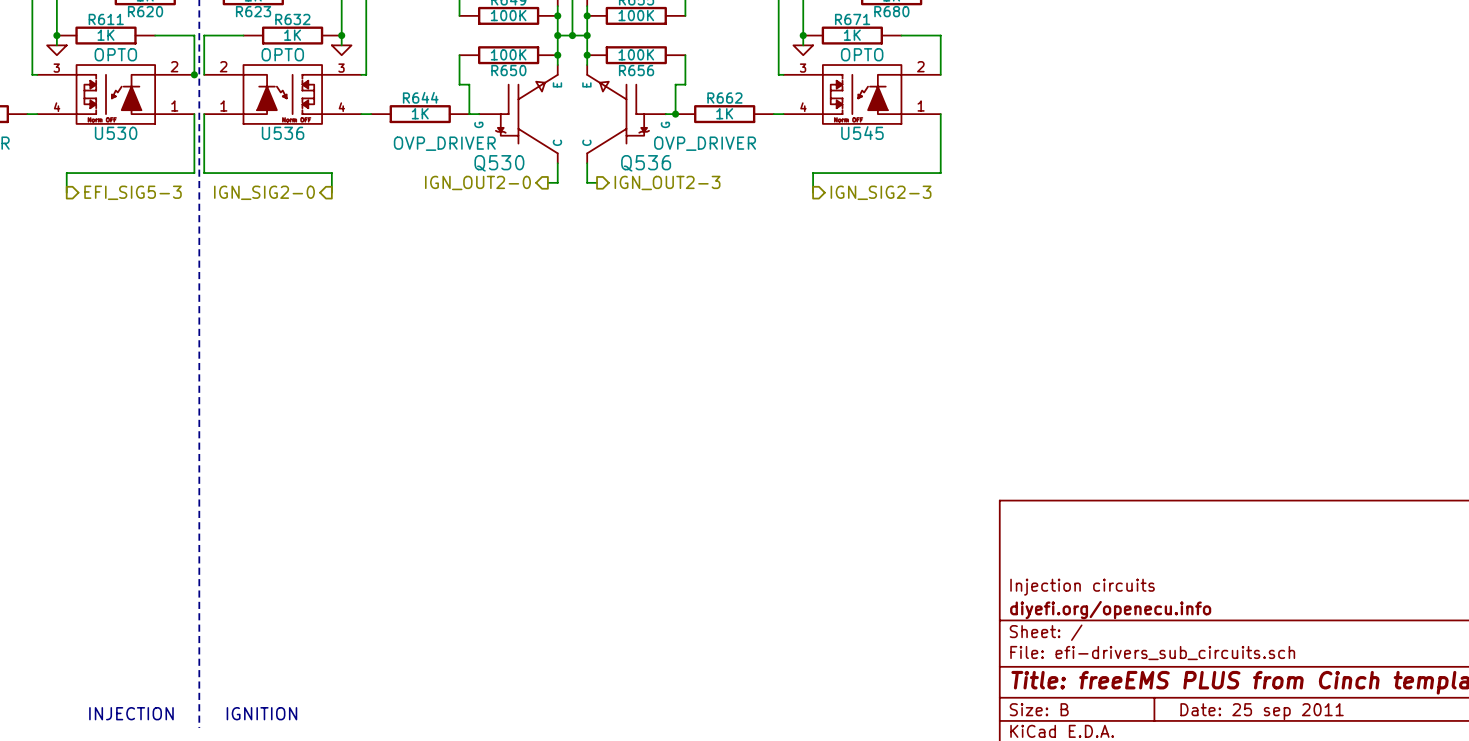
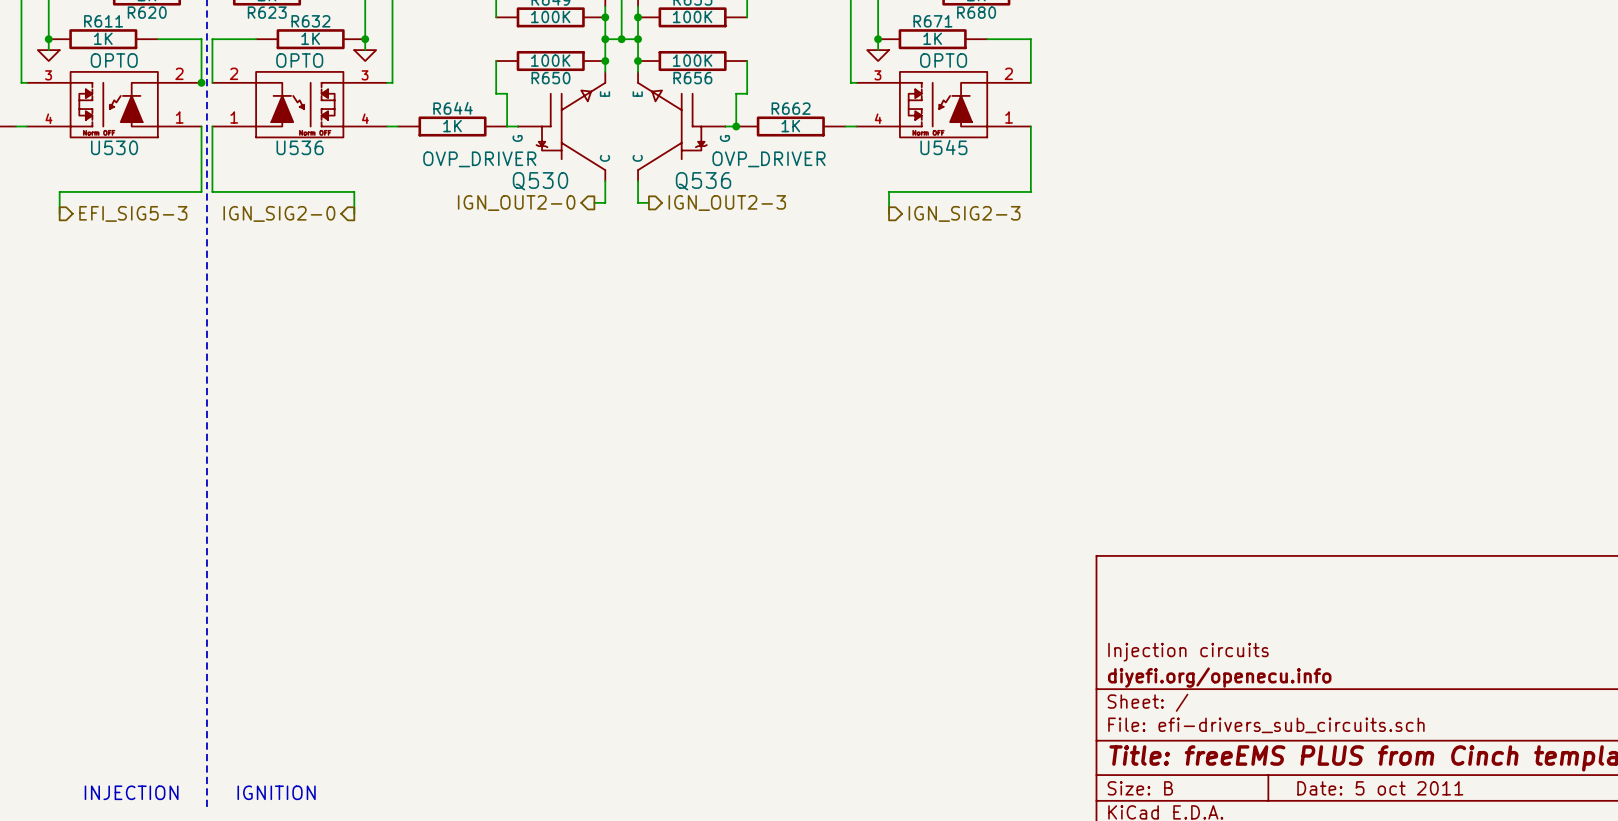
title block: Date: 25 sep 2011 (1262, 711) -> Date: 5 oct 2011 (1380, 788)

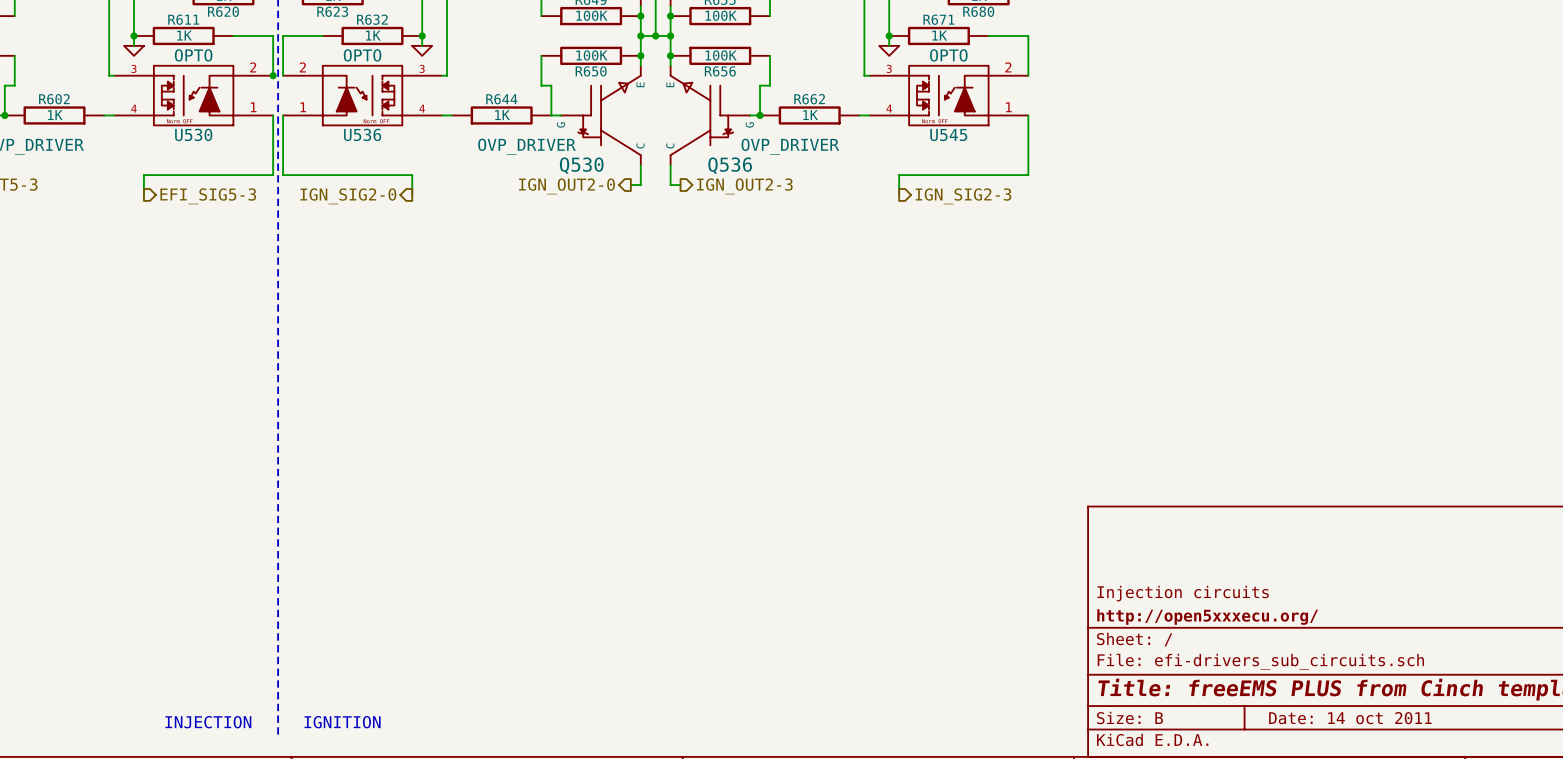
title block: diyefi.org/openecu.info (1219, 677) -> http://open5xxxecu.org/ (1207, 617)
title block: Date: 5 oct 2011 (1380, 788) -> Date: 14 oct 2011 (1350, 718)

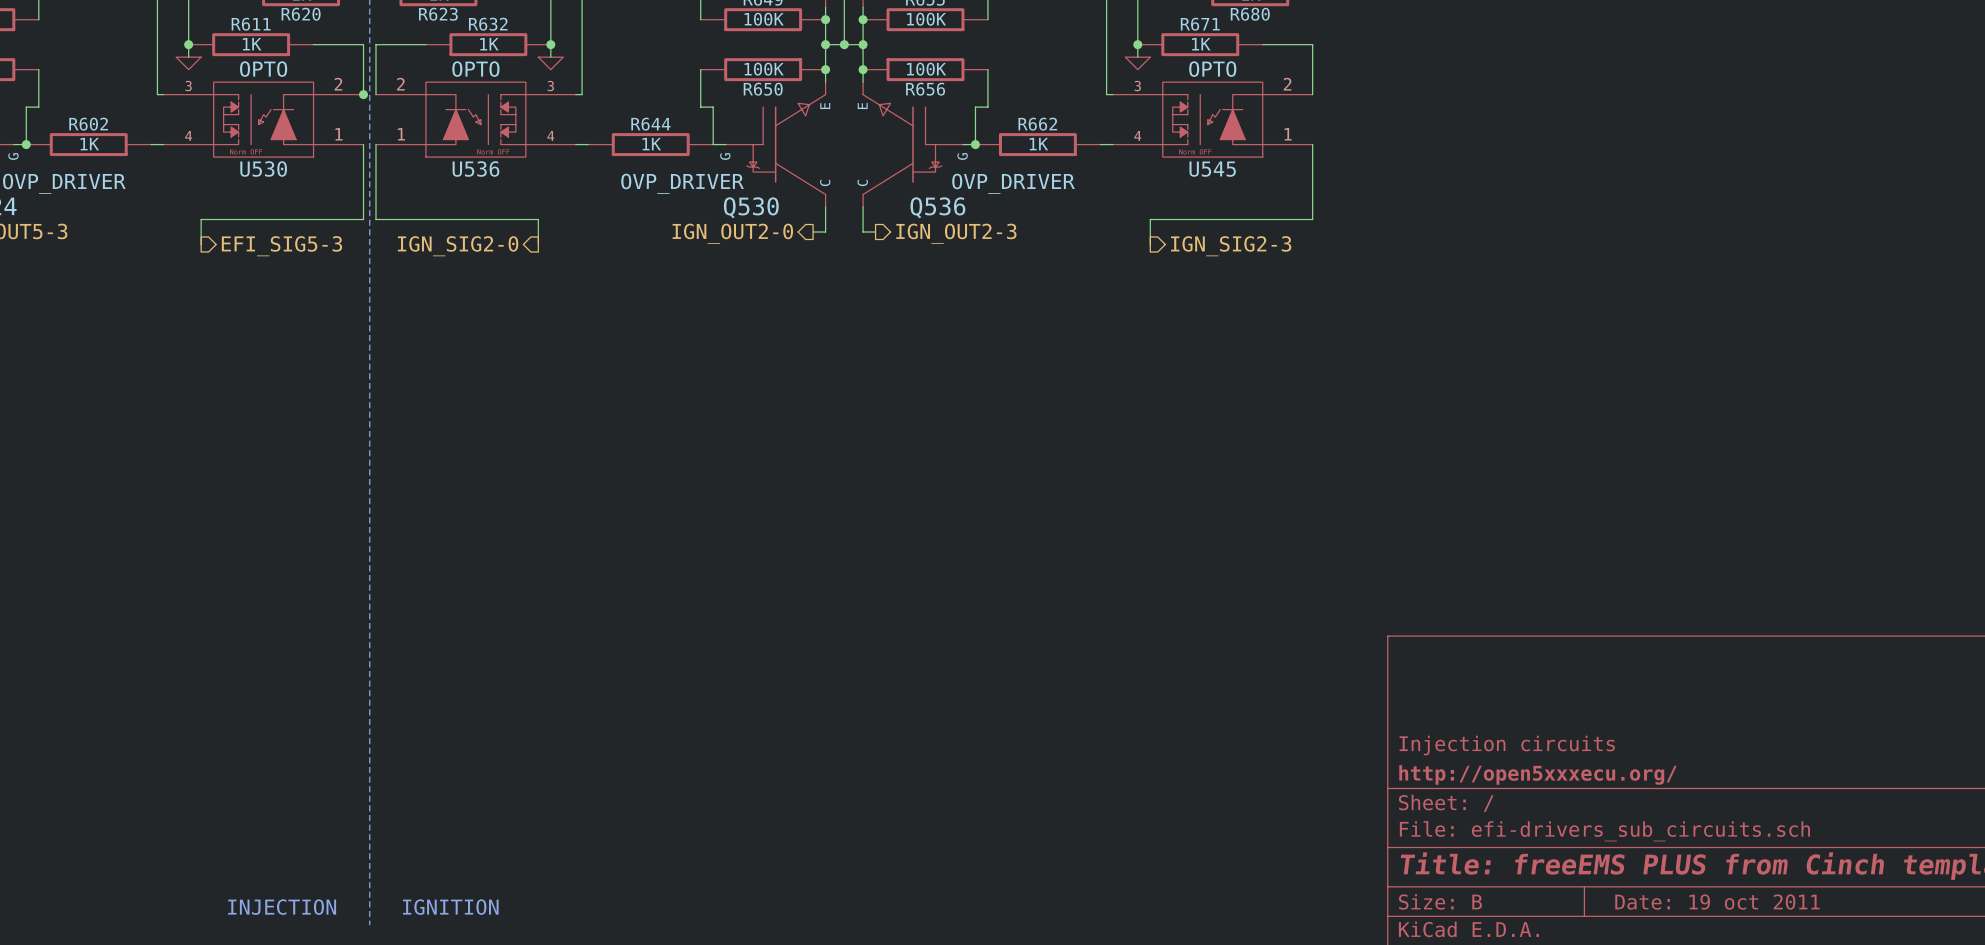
title block: Date: 14 oct 2011 (1350, 718) -> Date: 19 oct 2011 (1717, 902)

